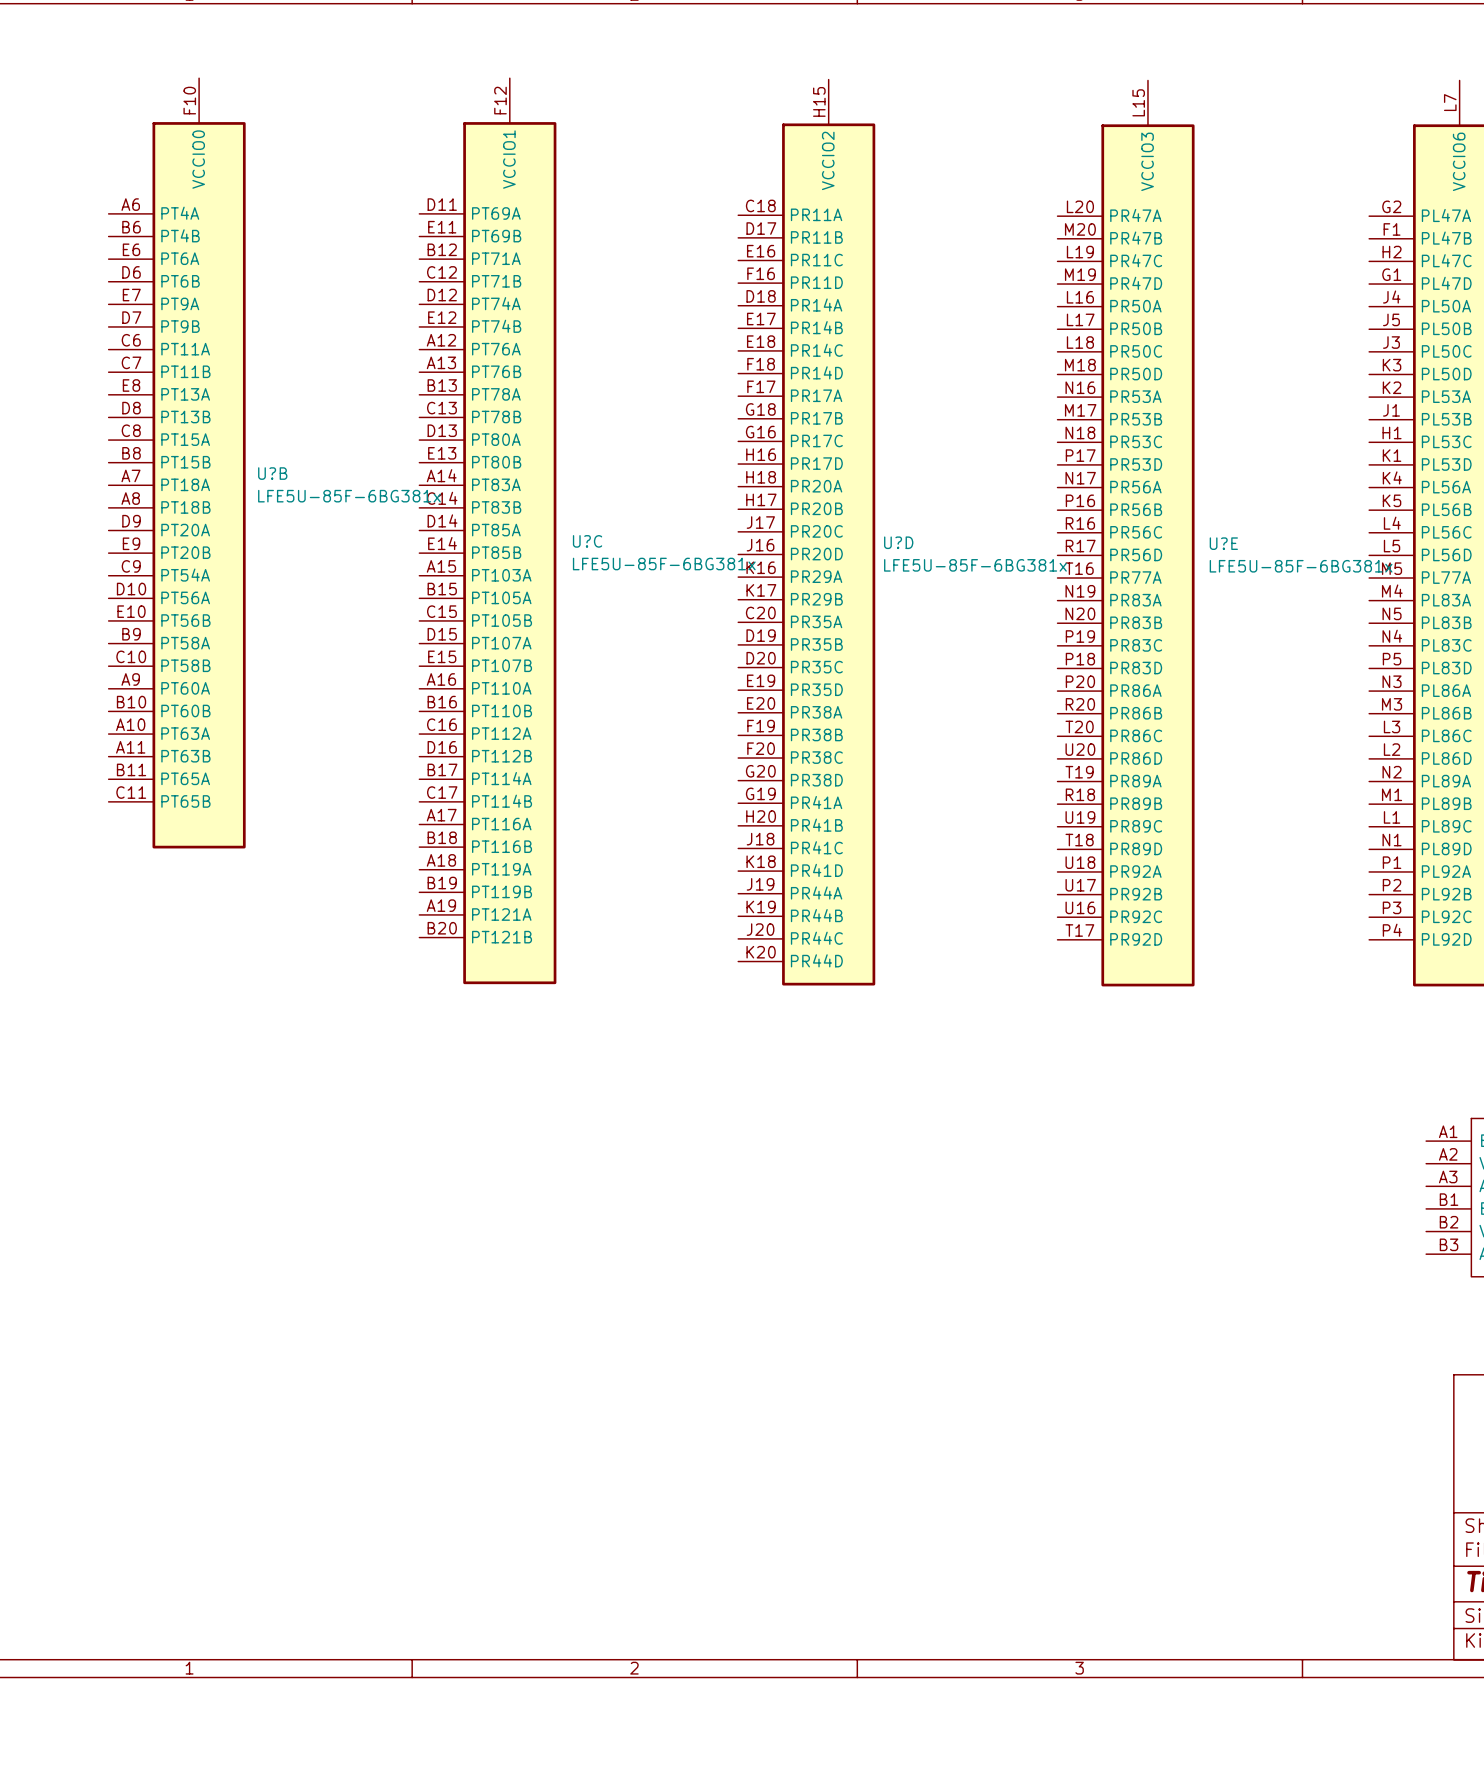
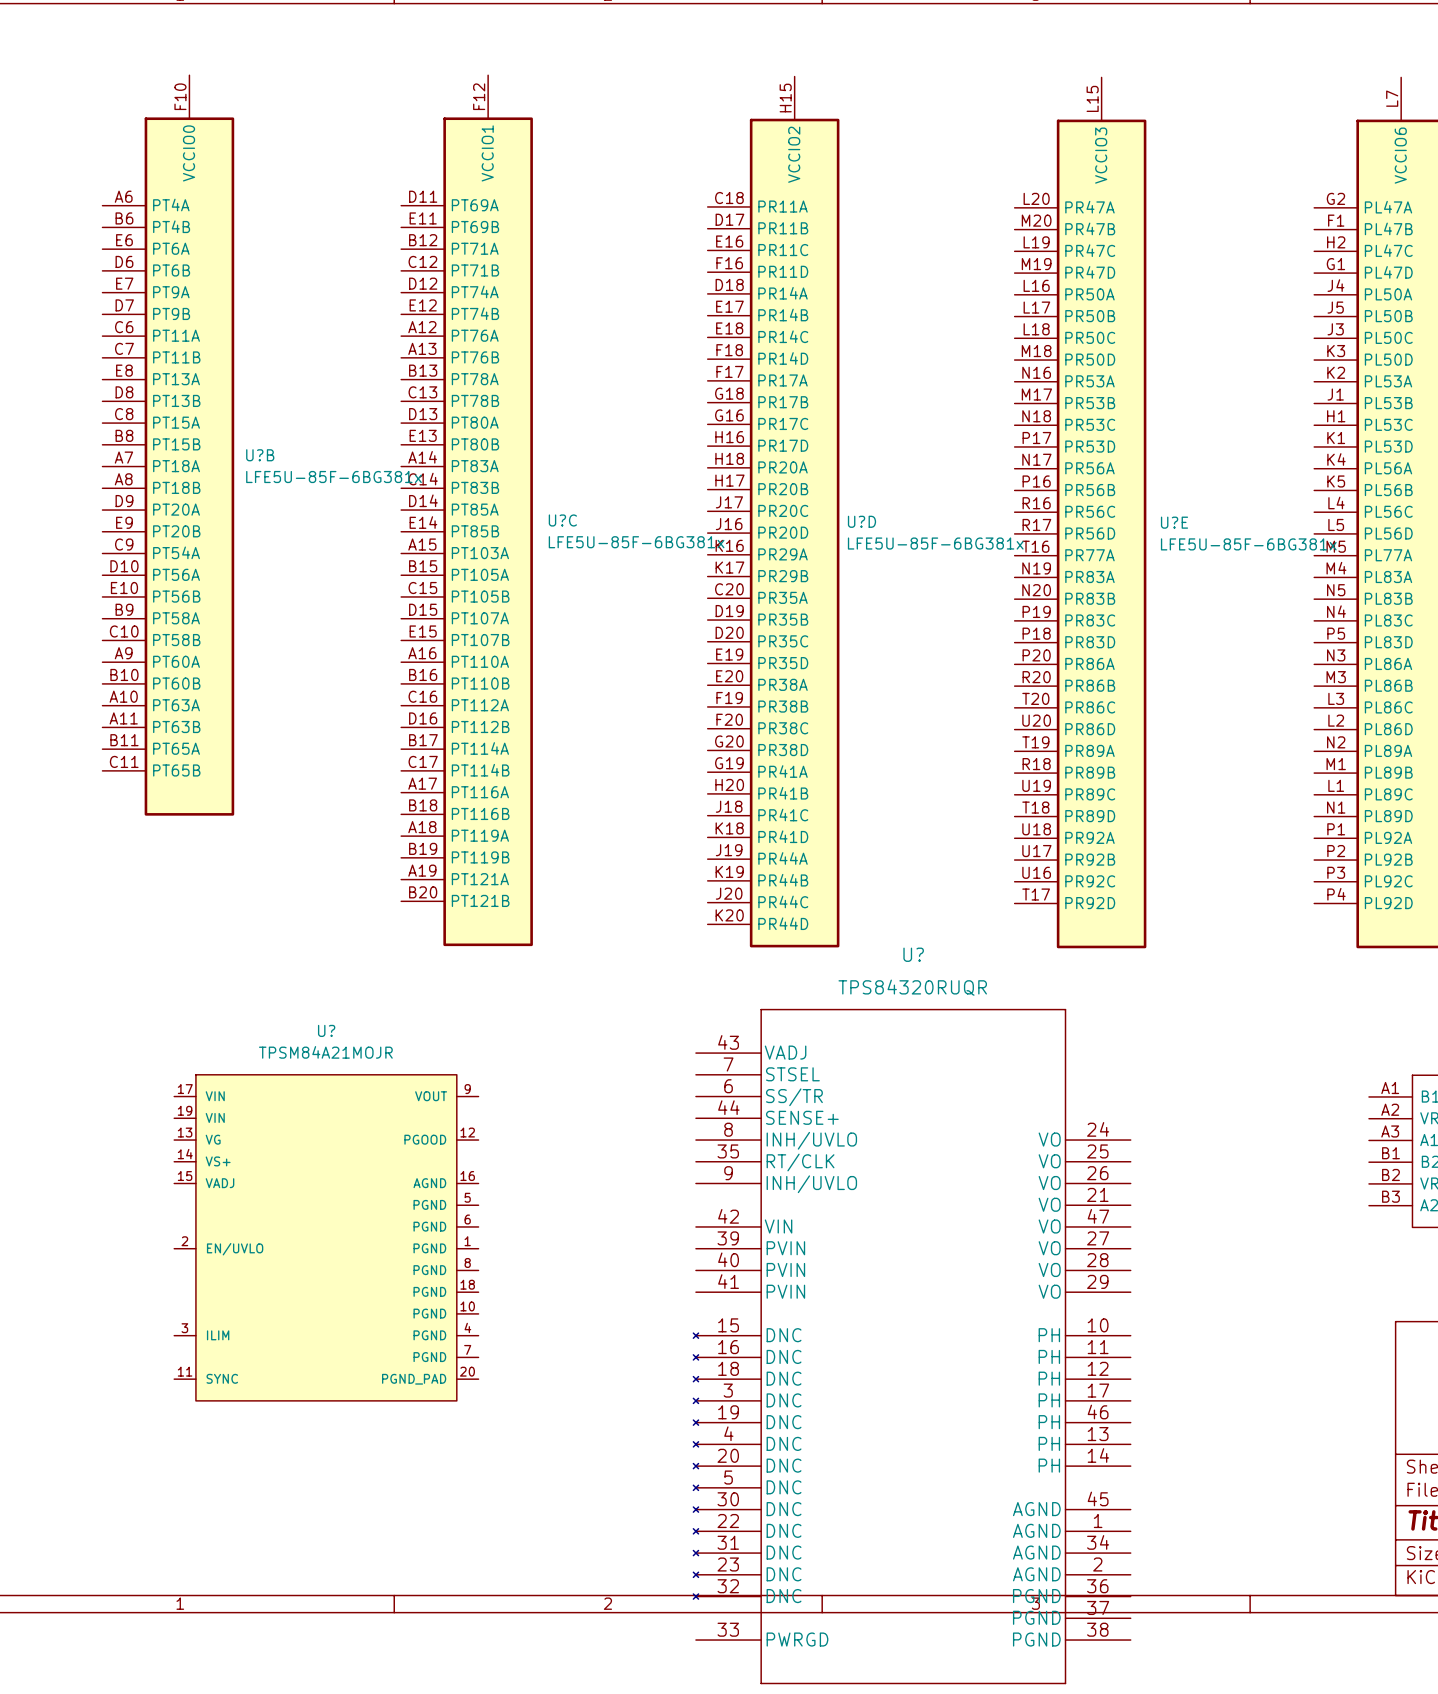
U?: none -> TPSM84A21MOJR (326, 1237)
U?: none -> TPS84320RUQR (912, 1346)

